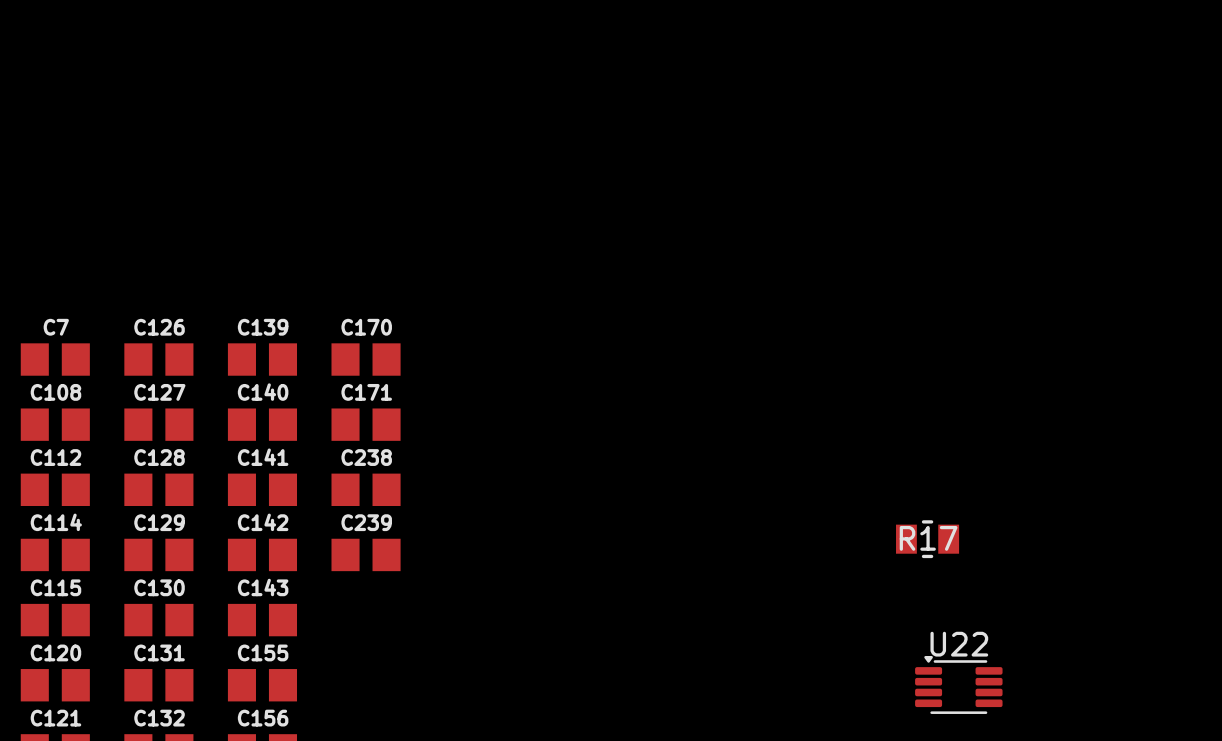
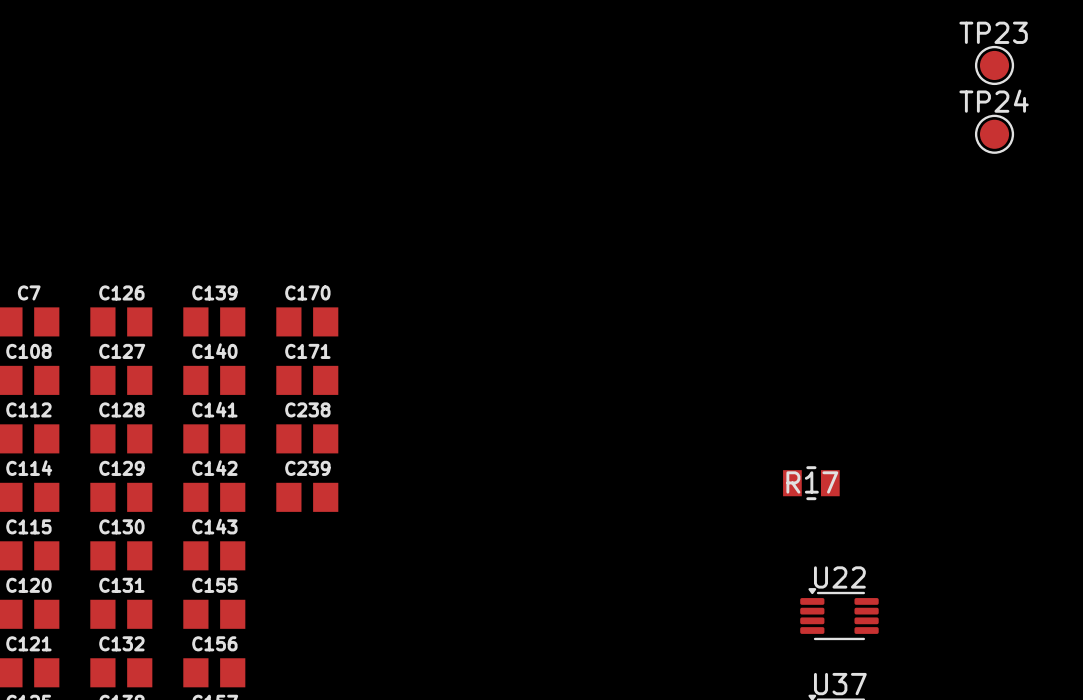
TP23: none -> (994, 65)
TP24: none -> (994, 134)

